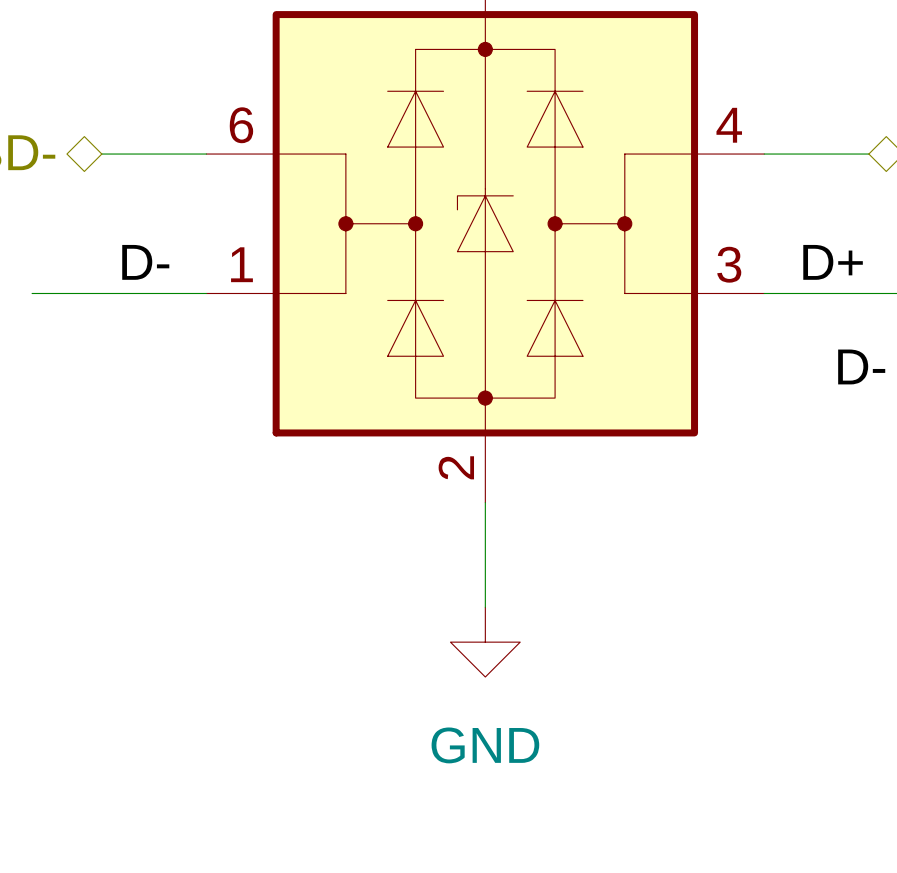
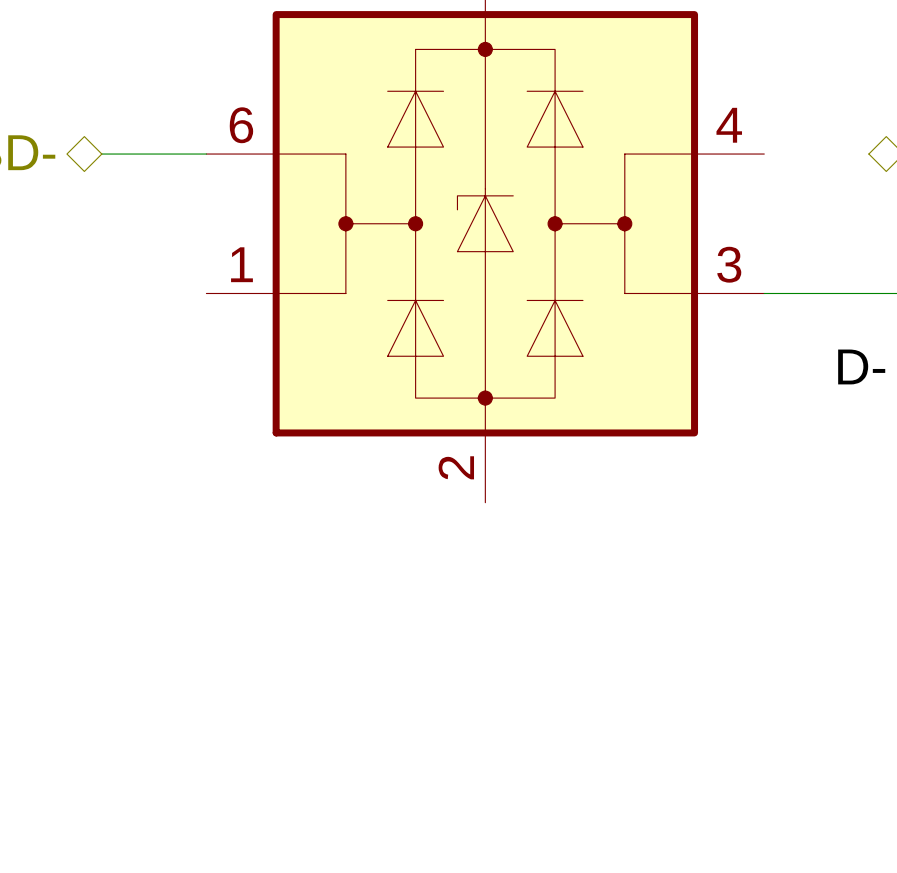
wire: (764, 154) (868, 154) -> none
label: D- (145, 262) -> none
label: D+ (833, 262) -> none
wire: (32, 293) (206, 293) -> none
wire: (485, 502) (485, 607) -> none
power symbol: GND (485, 642) -> none

